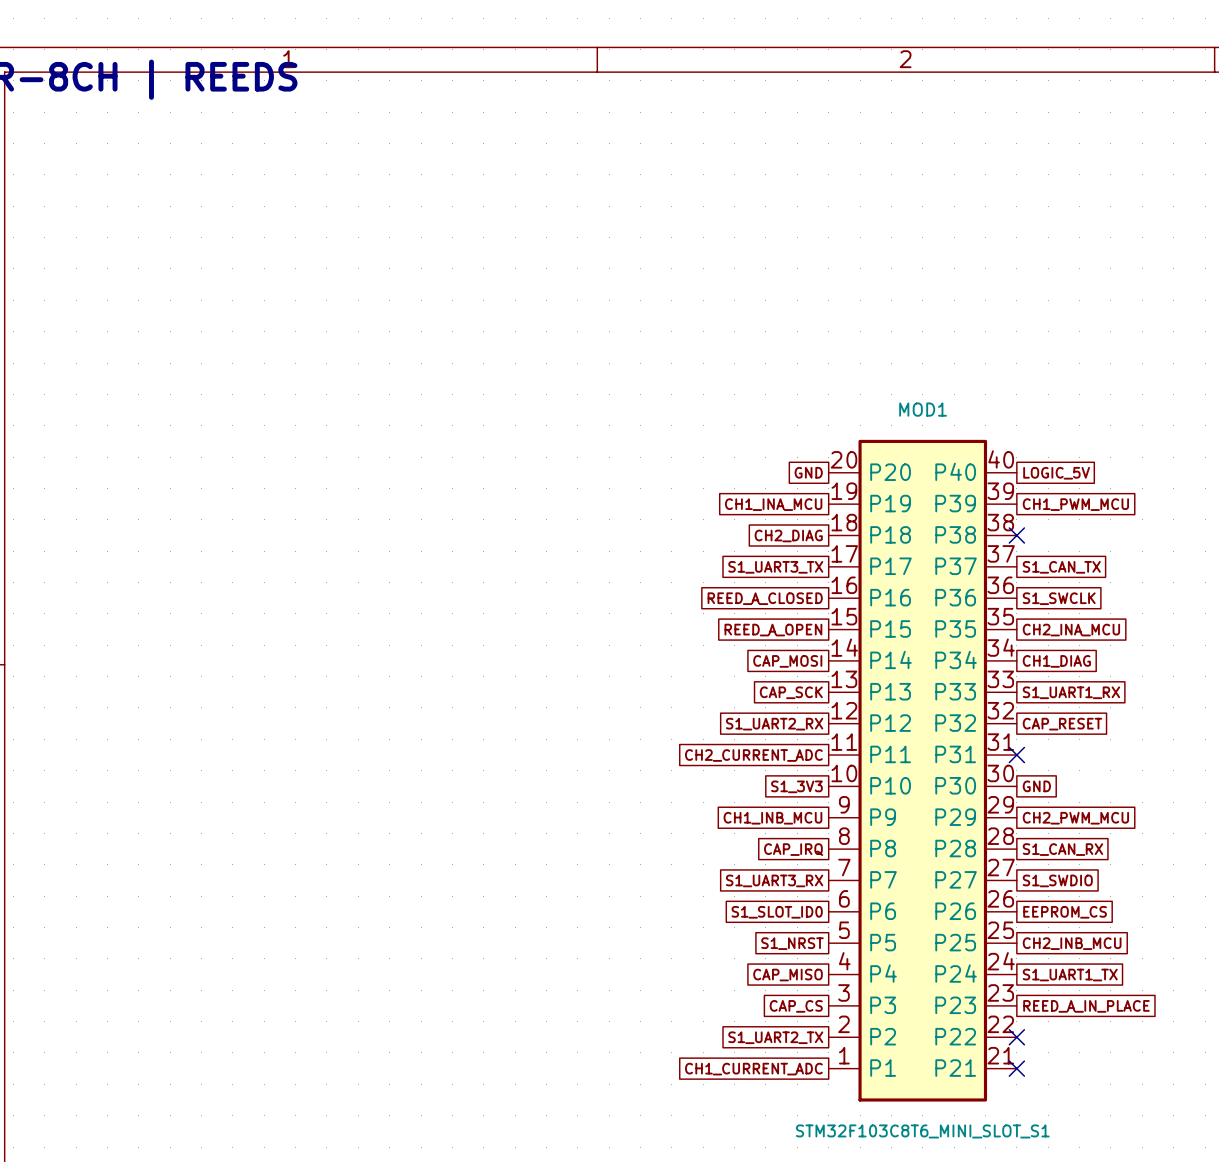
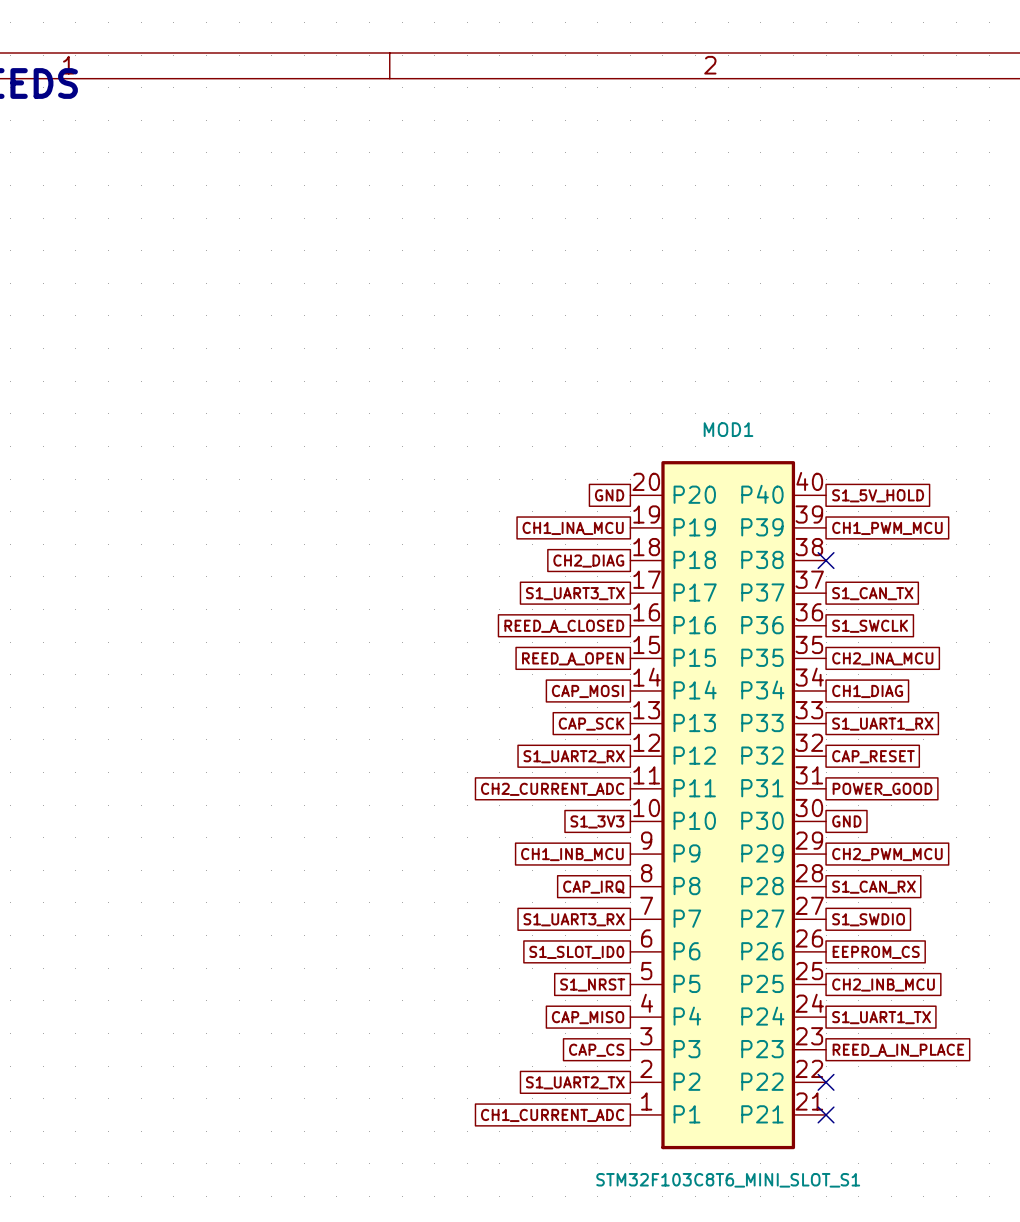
global label: LOGIC_5V (1056, 473) -> S1_5V_HOLD (878, 495)
no-connect mark: (1016, 755) -> none
global label: none -> POWER_GOOD (882, 789)

